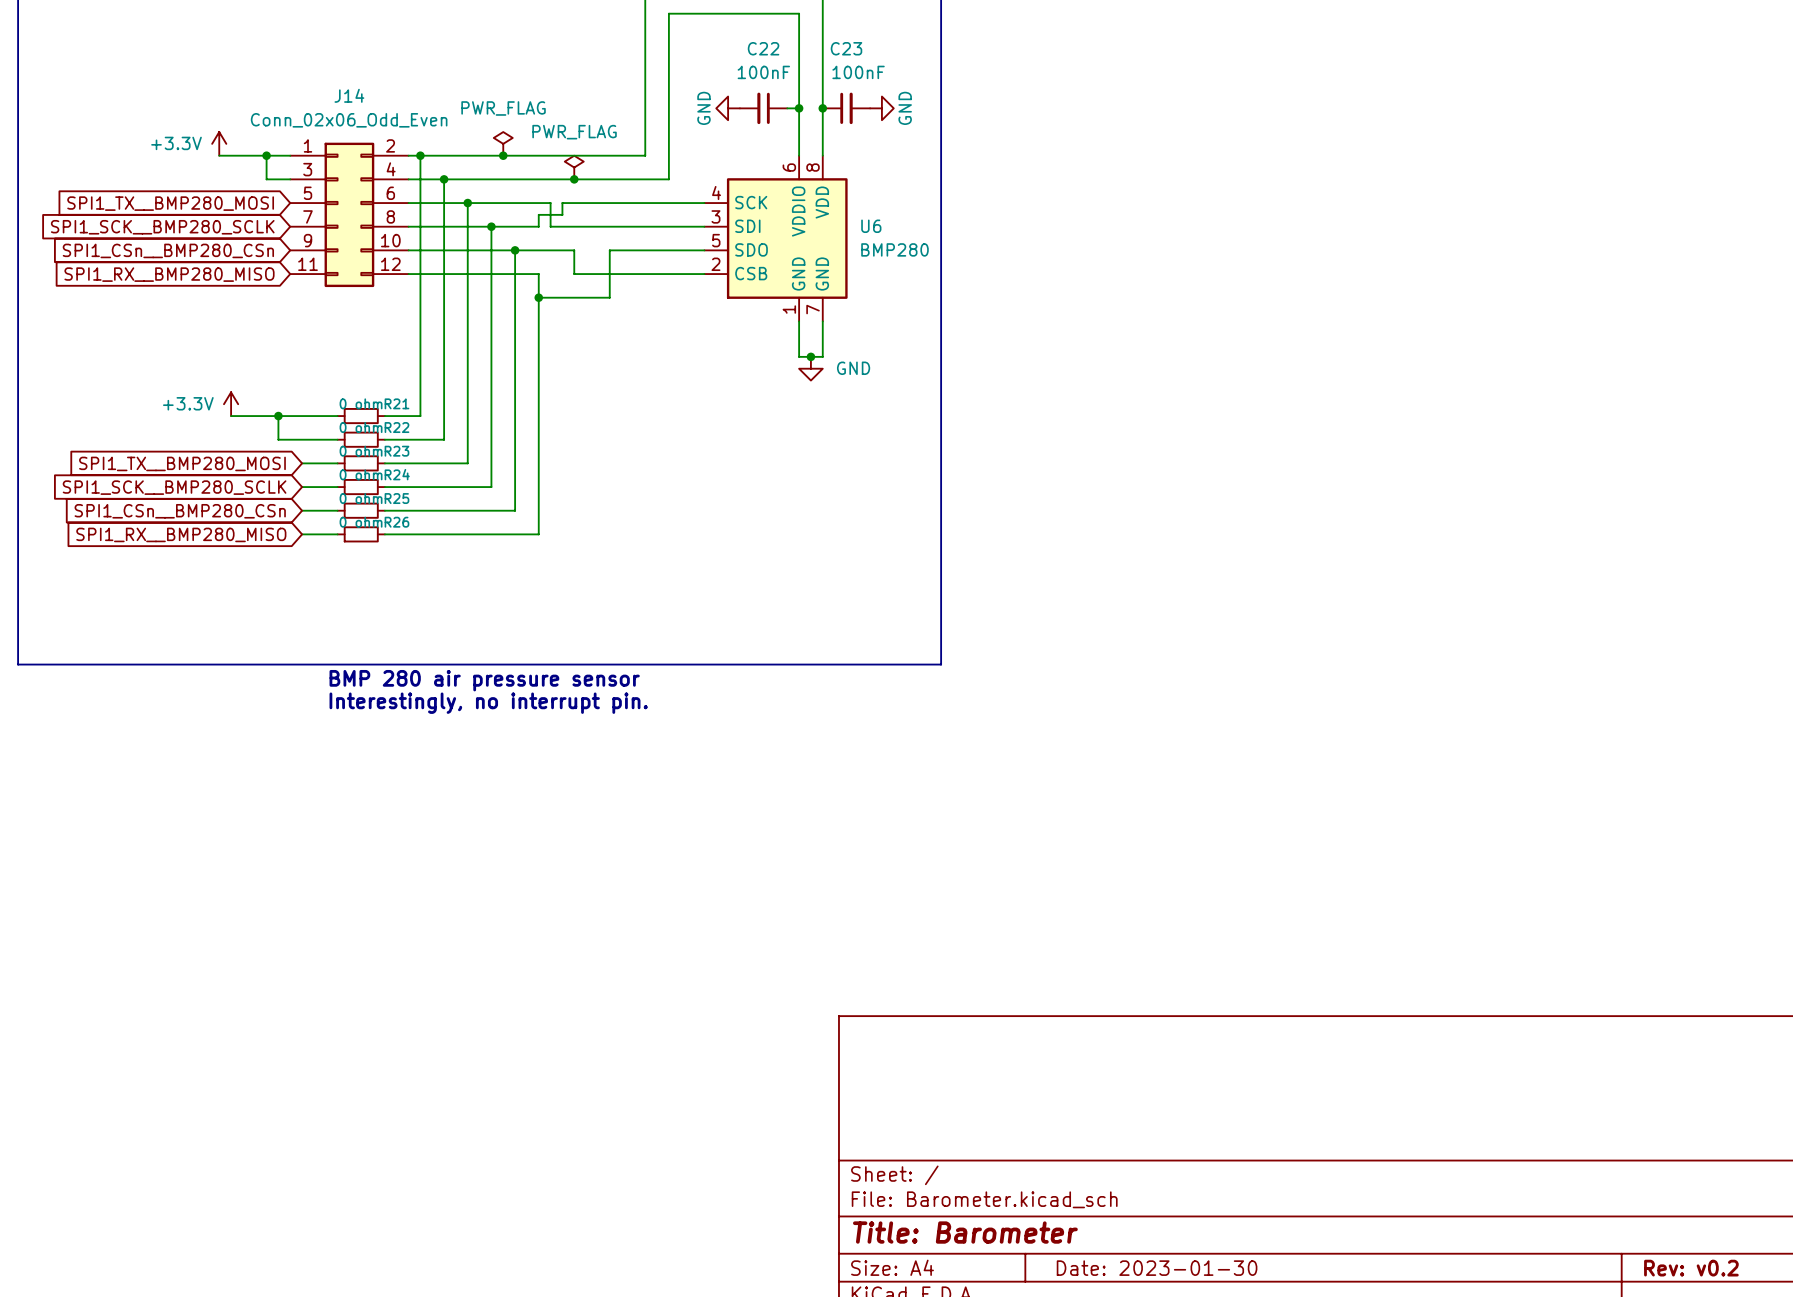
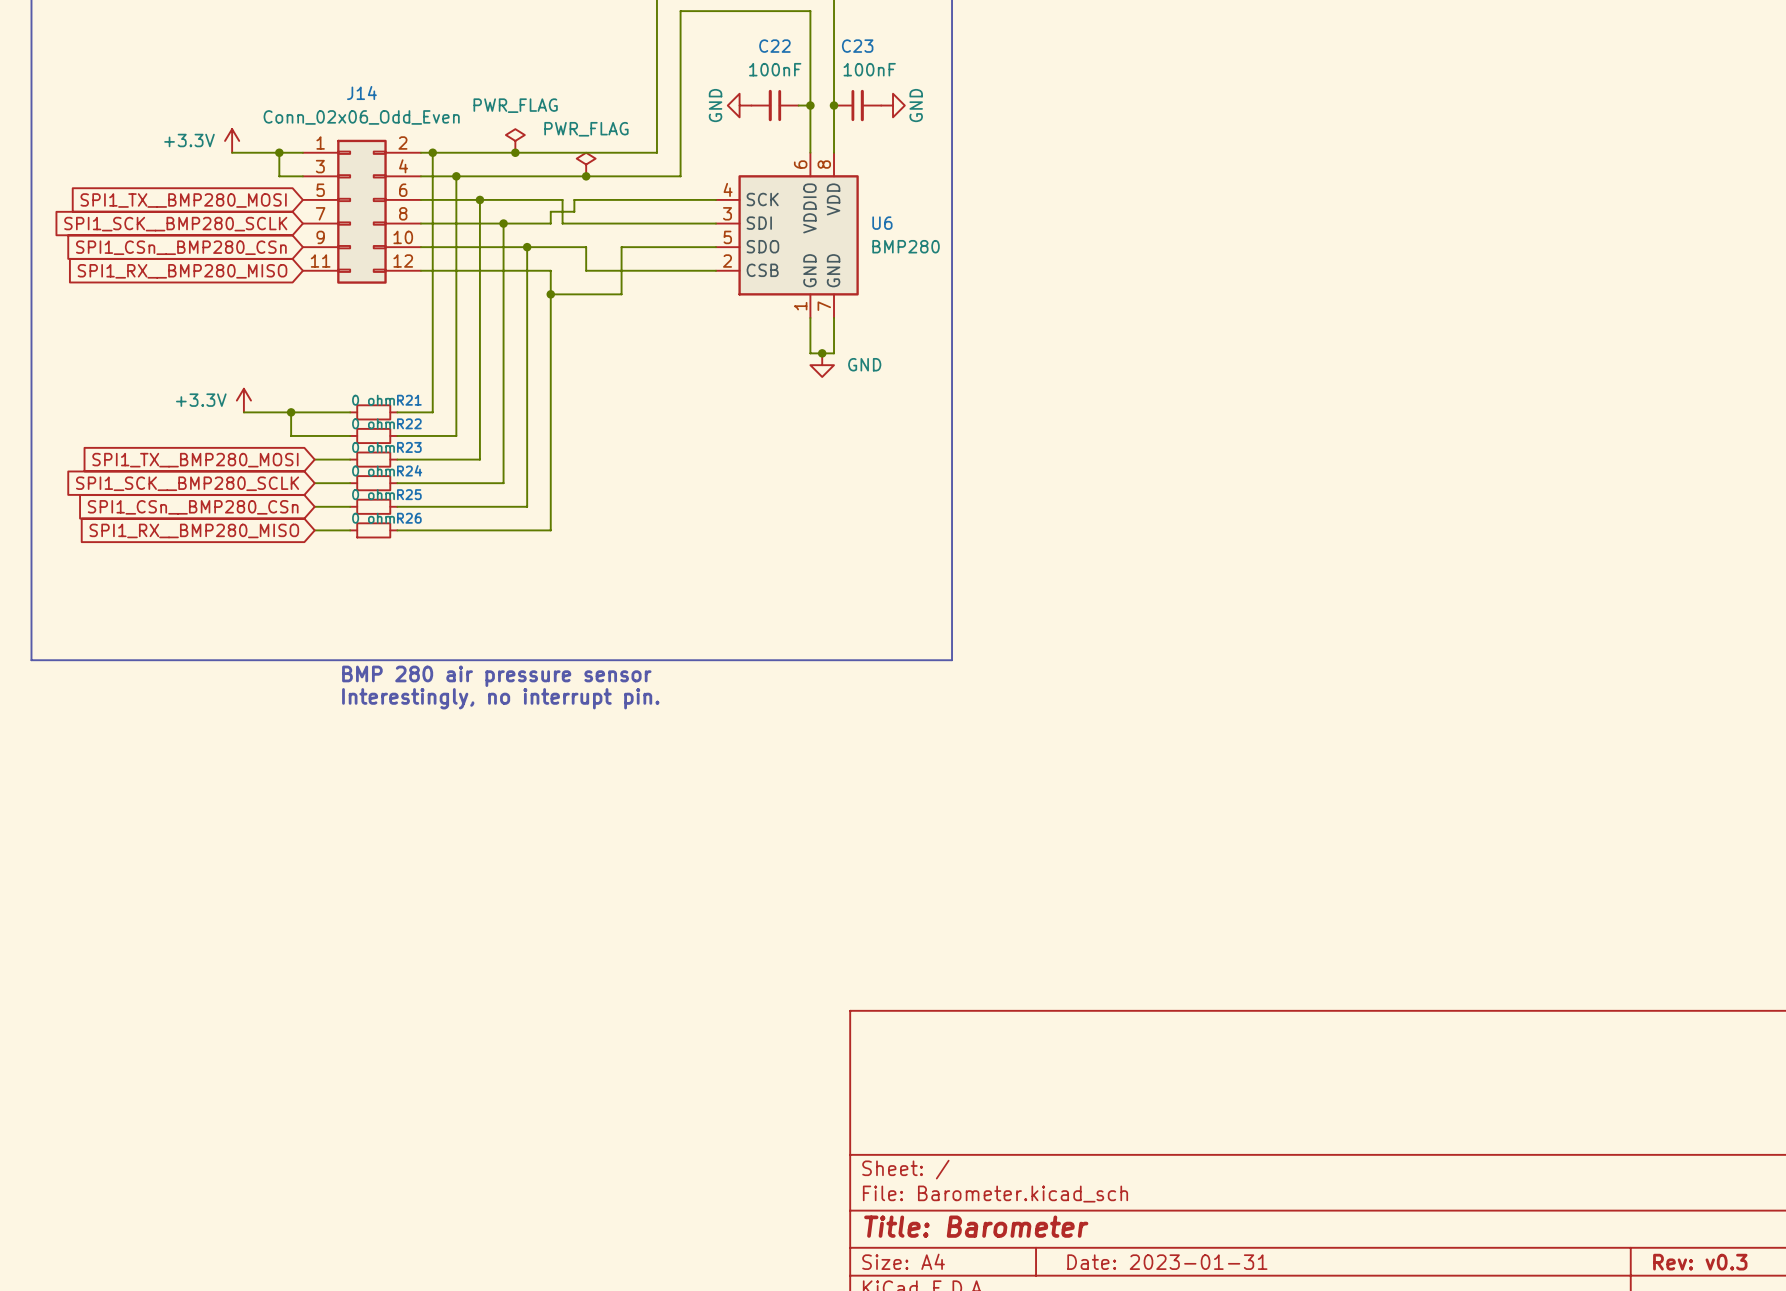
title block: Date: 2023-01-30 (1157, 1268) -> Date: 2023-01-31 (1167, 1262)
title block: Rev: v0.2 (1691, 1268) -> Rev: v0.3 (1700, 1262)

